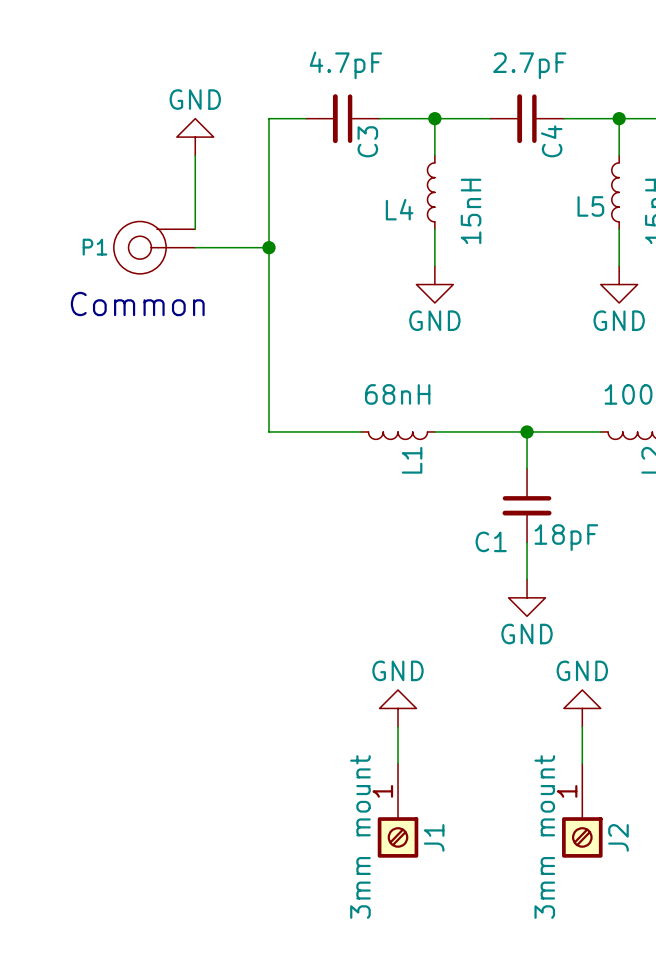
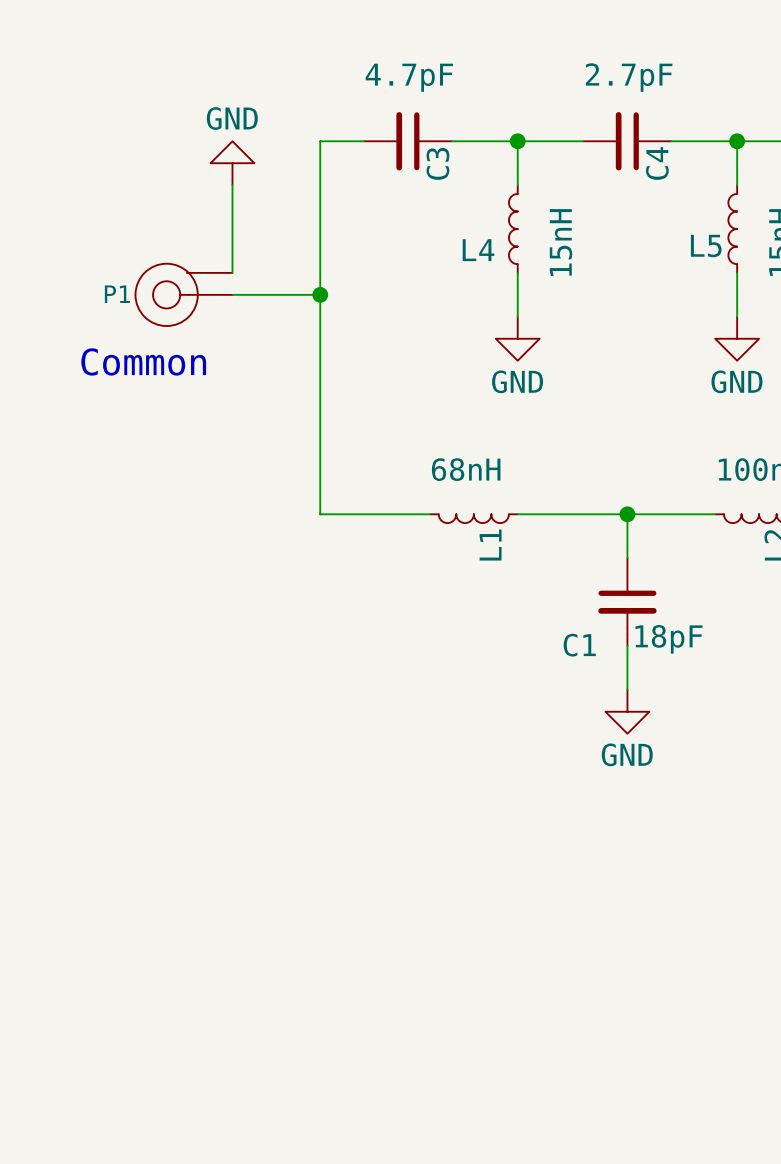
power symbol: GND (398, 708) -> none
power symbol: GND (582, 708) -> none
wire: (398, 726) (398, 763) -> none
wire: (582, 726) (582, 763) -> none
J1: 3mm mount (398, 810) -> none
J2: 3mm mount (582, 810) -> none

